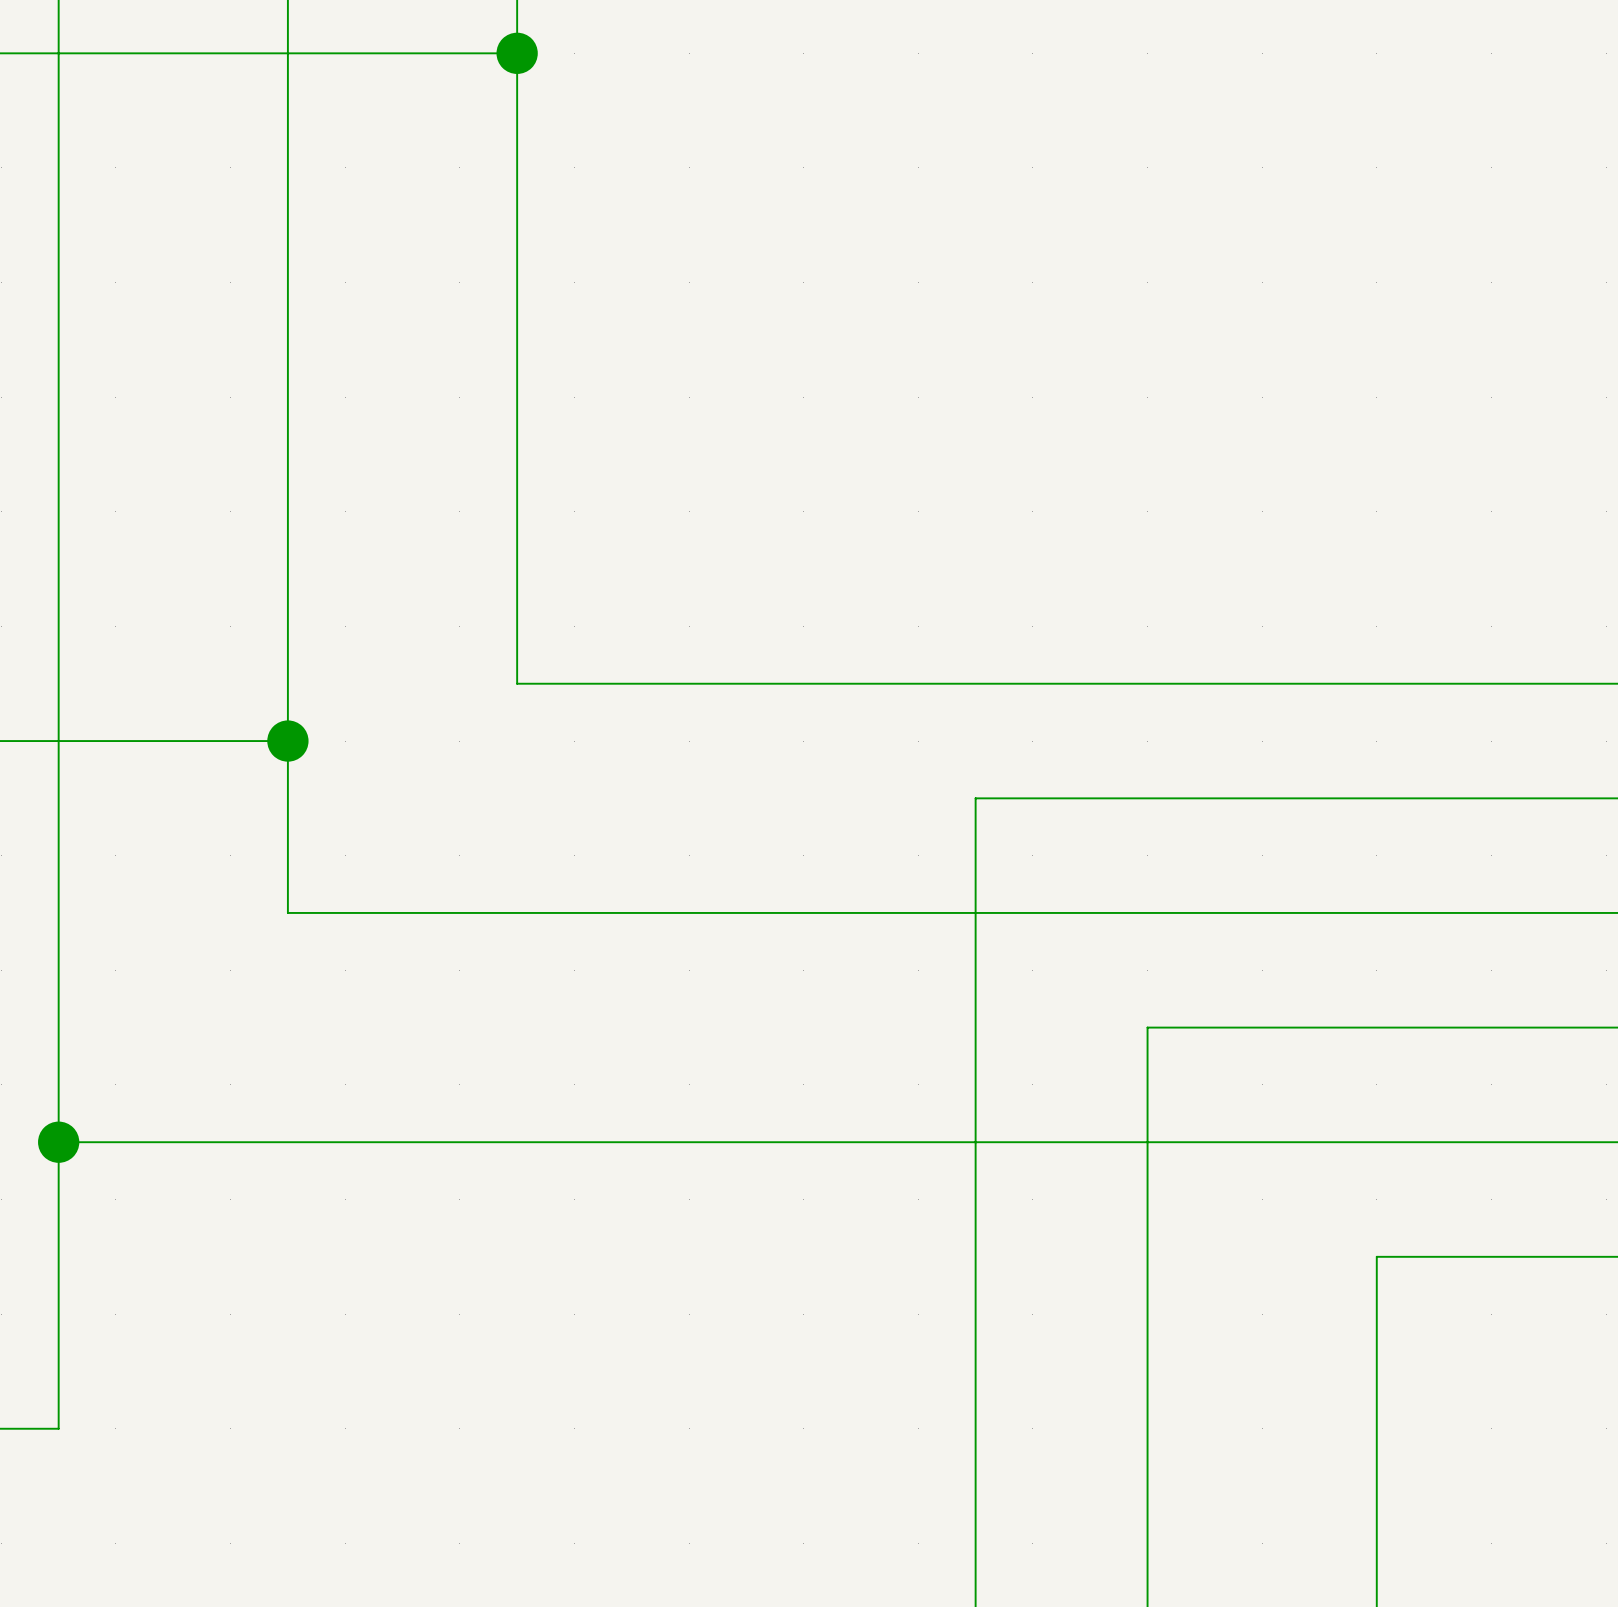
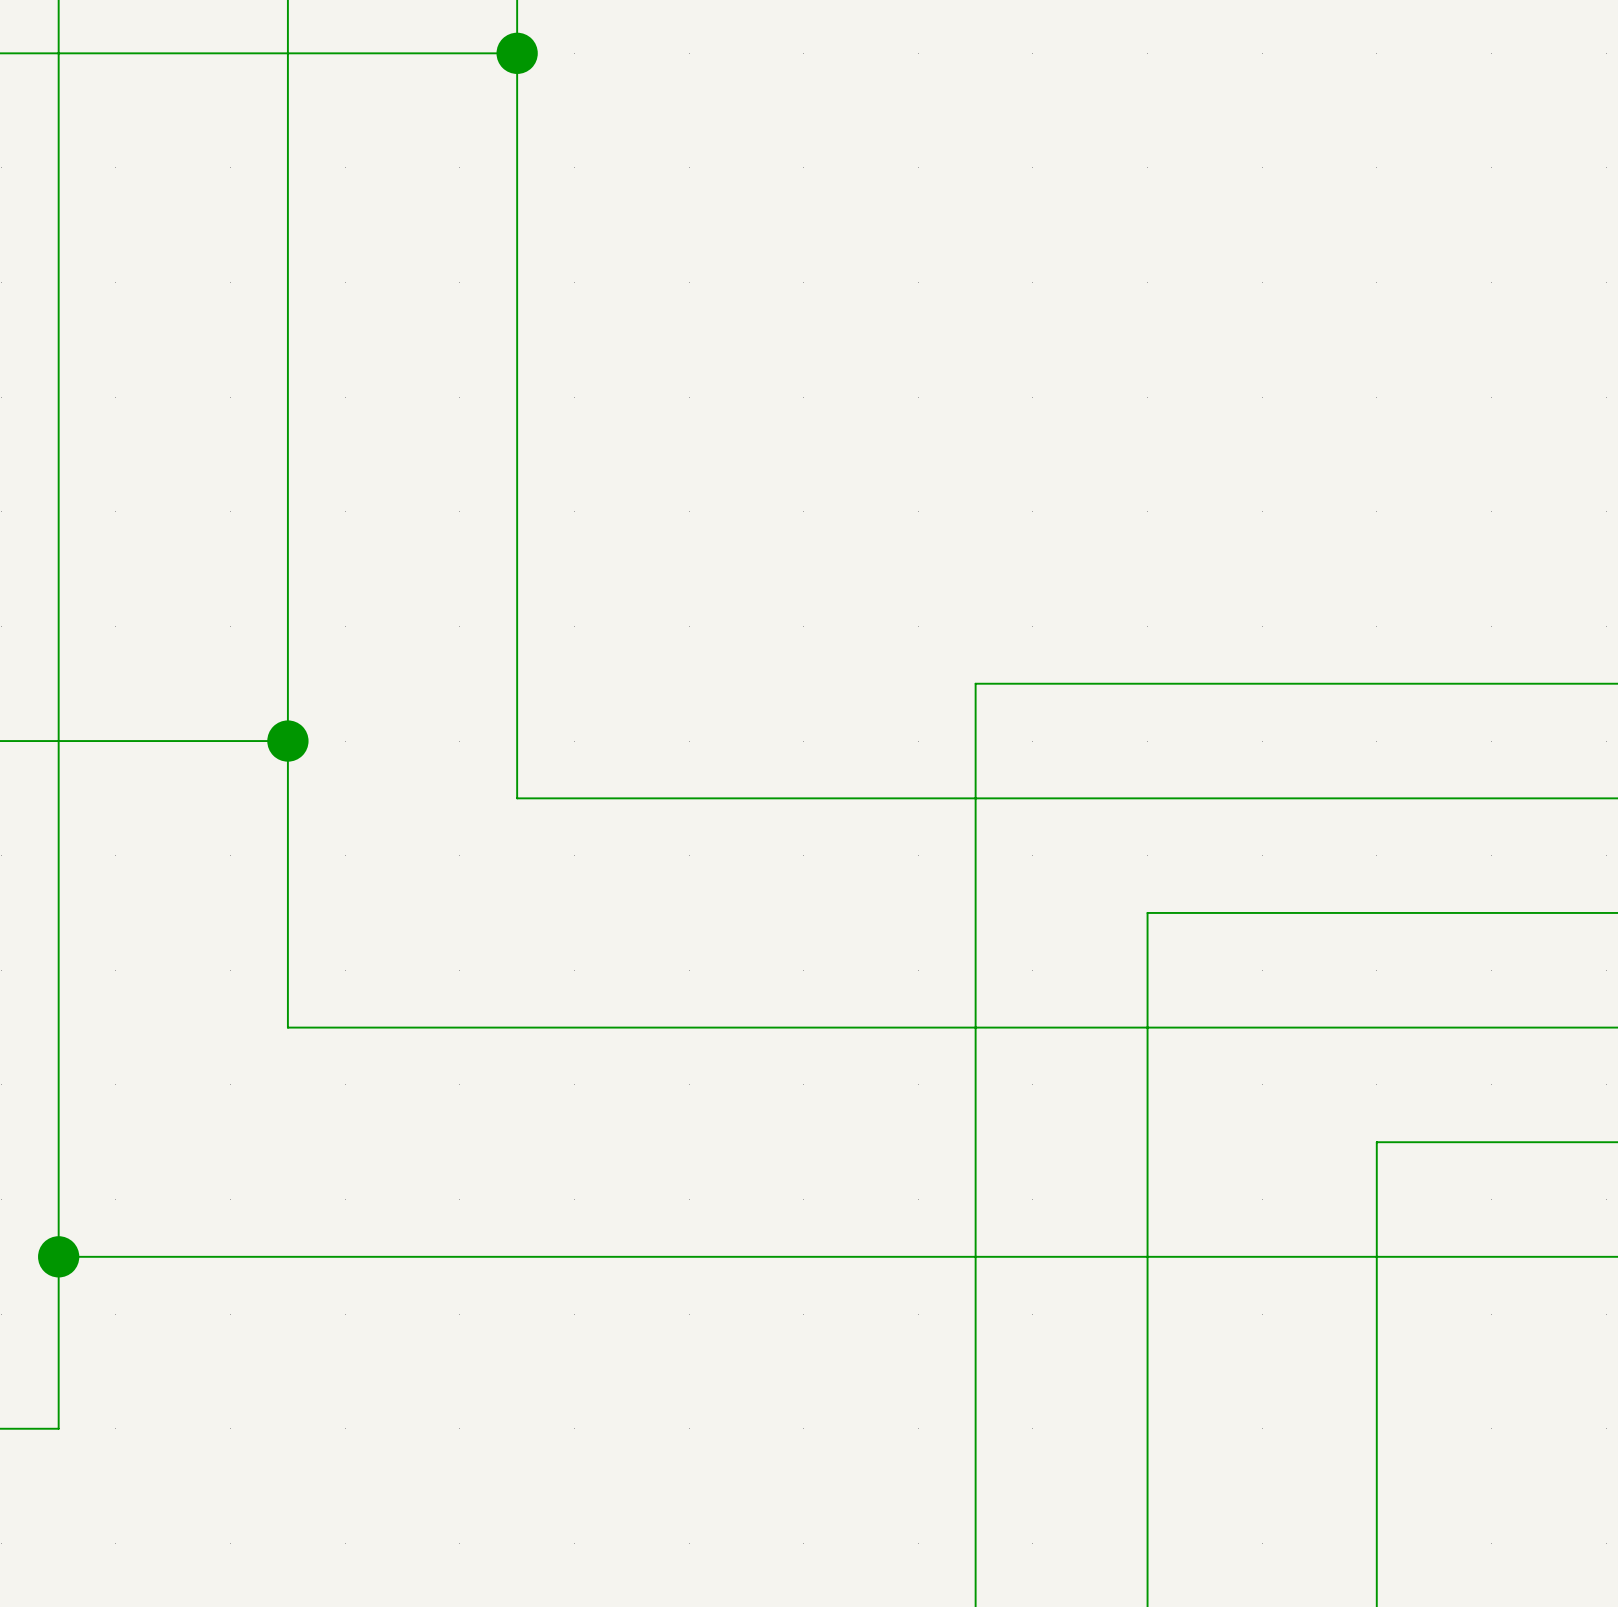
wire: (517, 683) (975, 683) -> (517, 683) (517, 798) (975, 798) (975, 683)
wire: (287, 912) (1147, 912) -> (287, 912) (287, 1027) (1147, 1027) (1147, 912)
wire: (58, 1142) (1376, 1142) -> (58, 1256) (1376, 1256) (1376, 1142)
junction position: (58, 1142) -> (58, 1256)

